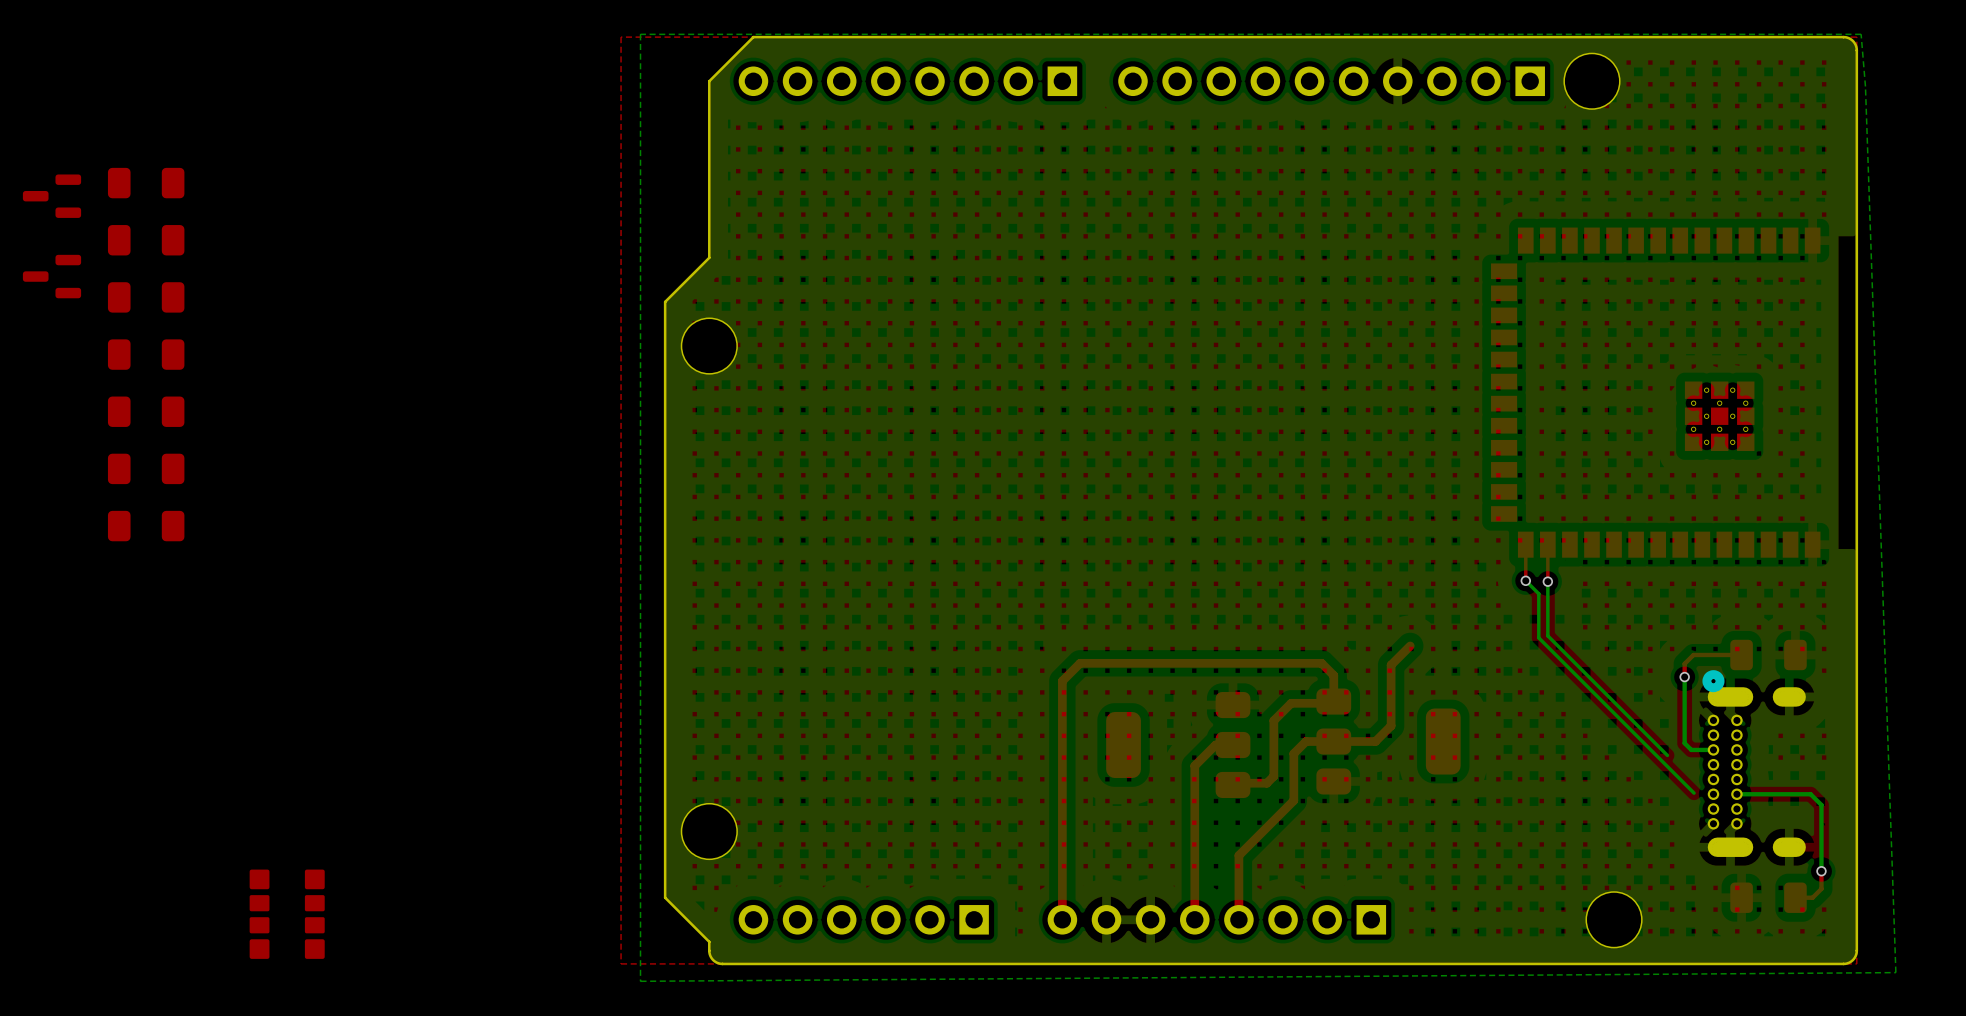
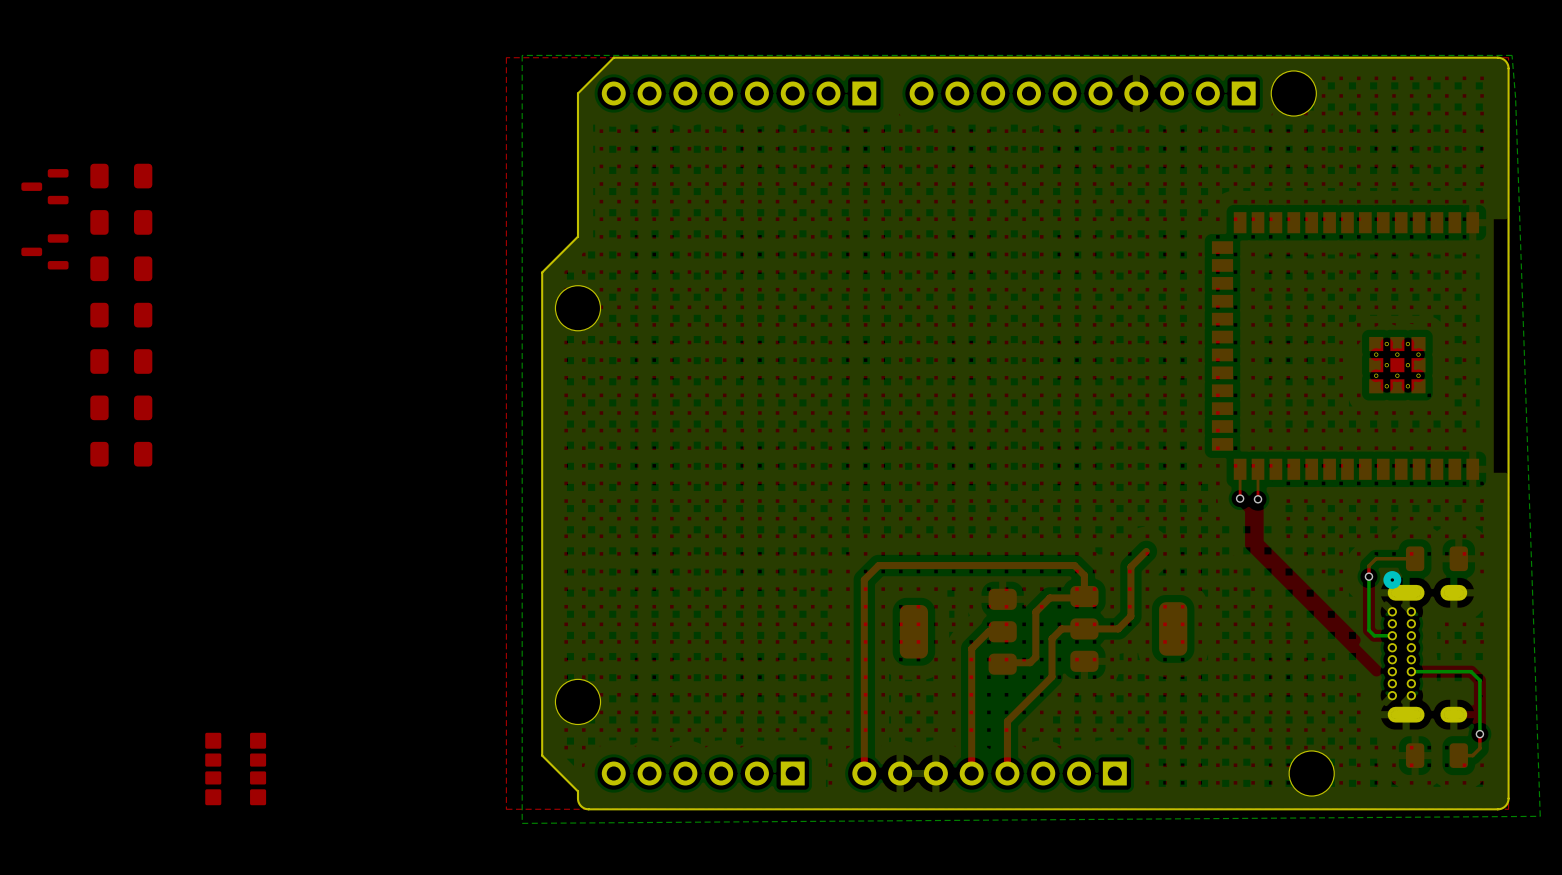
bottom track: (1525, 580) (1538, 593) (1538, 637) (1694, 793) -> none
bottom track: (1547, 581) (1547, 635) (1667, 755) -> none

